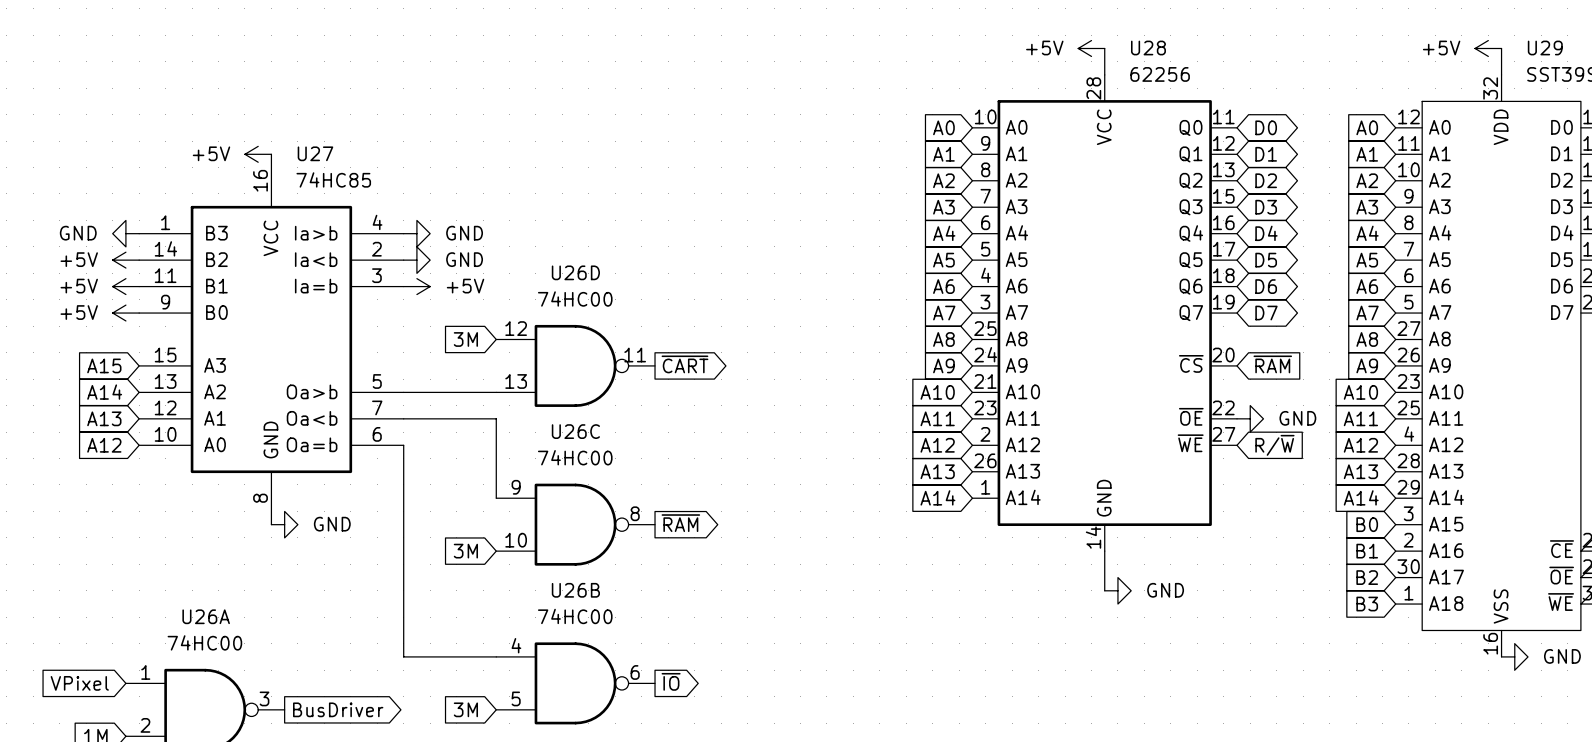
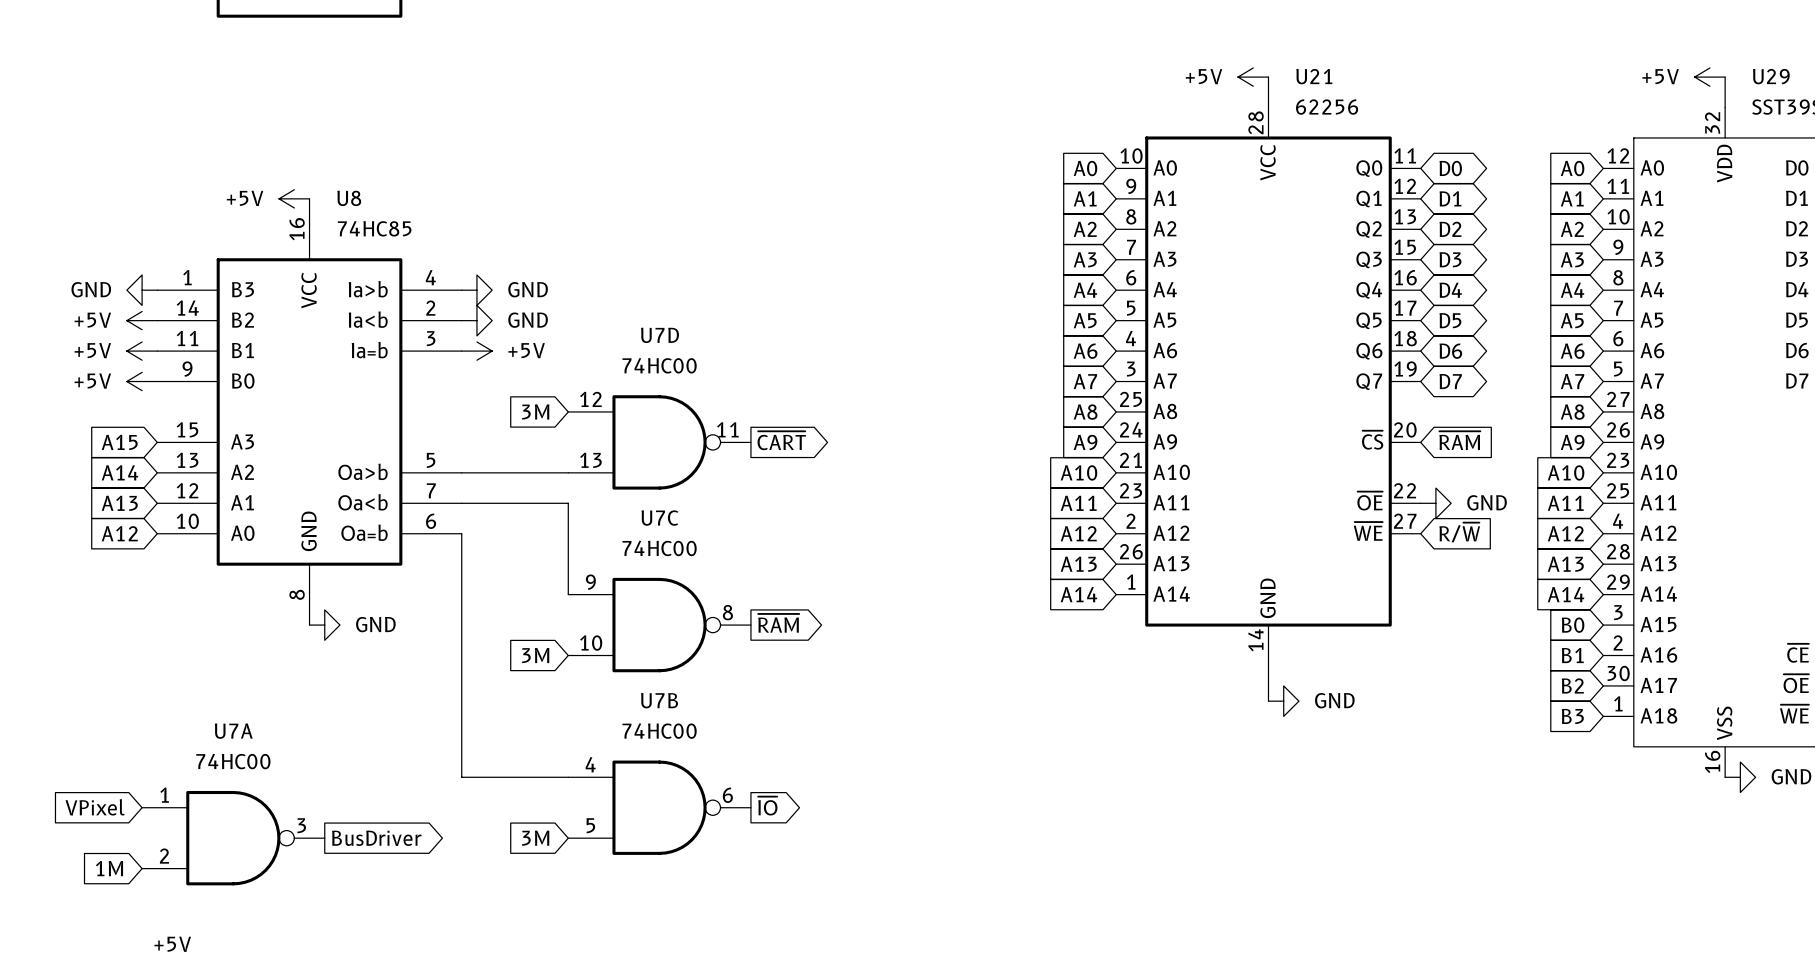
U28 name: U28 (1148, 47) -> U21 (1314, 76)
U27 name: U27 (315, 153) -> U8 (349, 198)
U26D name: U26D (575, 272) -> U7D (659, 335)
U26C name: U26C (575, 431) -> U7C (659, 518)
U26B name: U26B (575, 590) -> U7B (659, 700)
U26A name: U26A (206, 616) -> U7A (233, 731)

